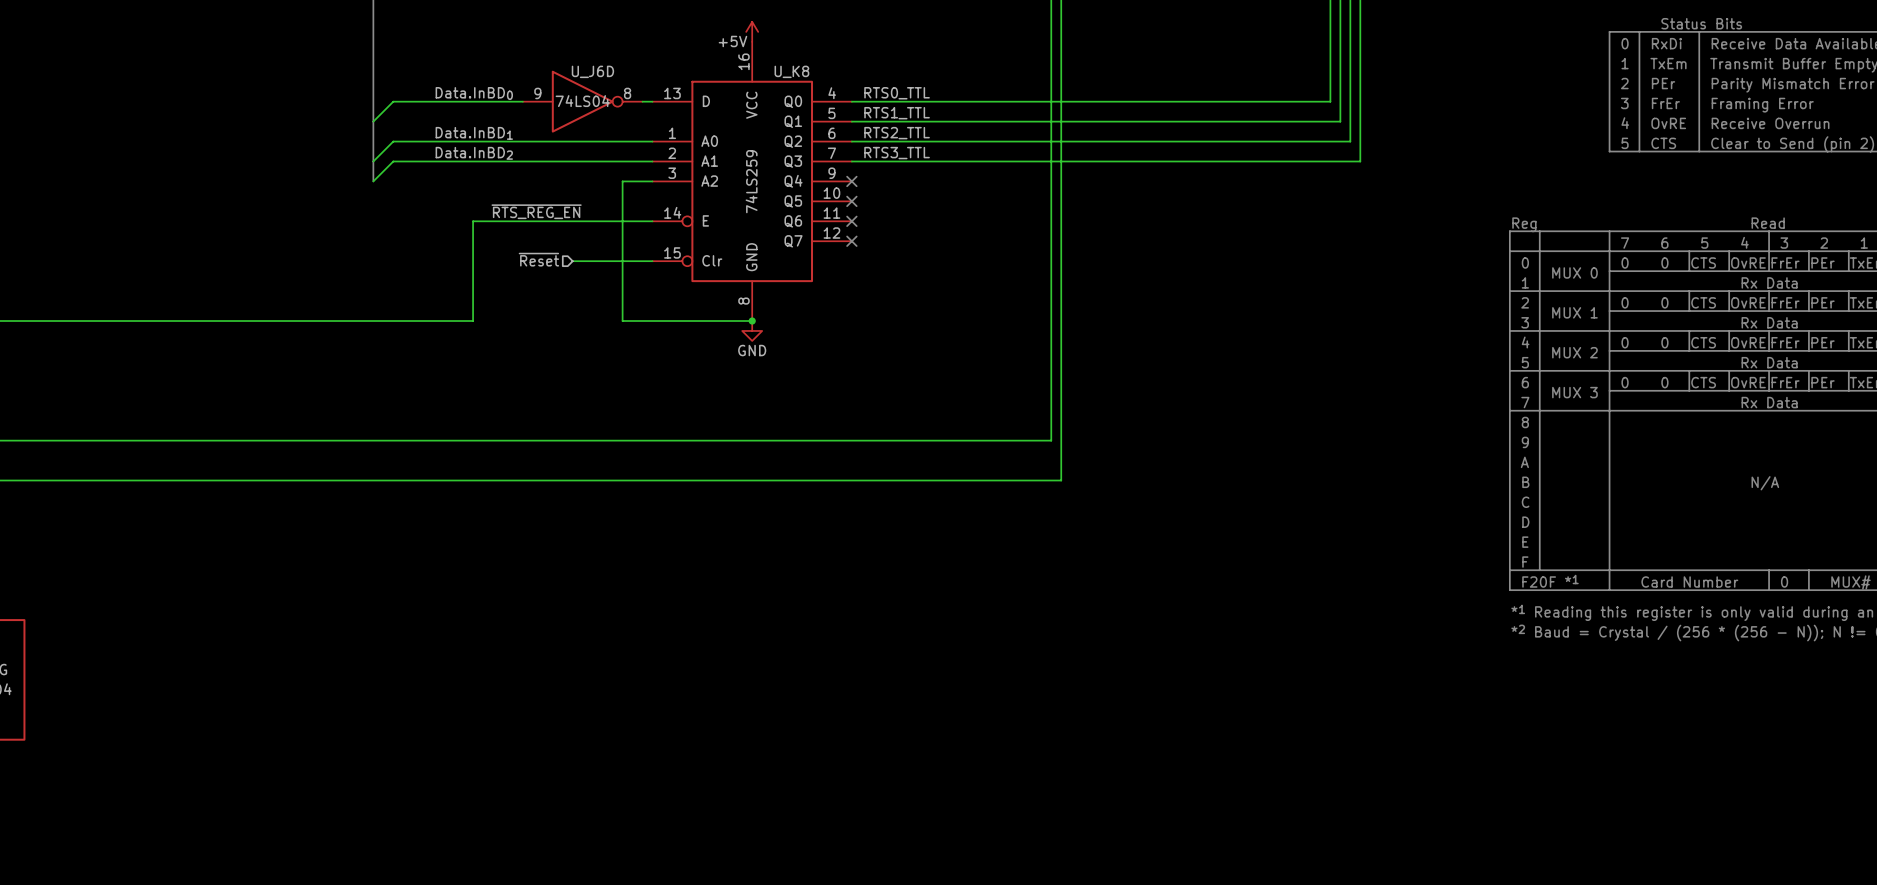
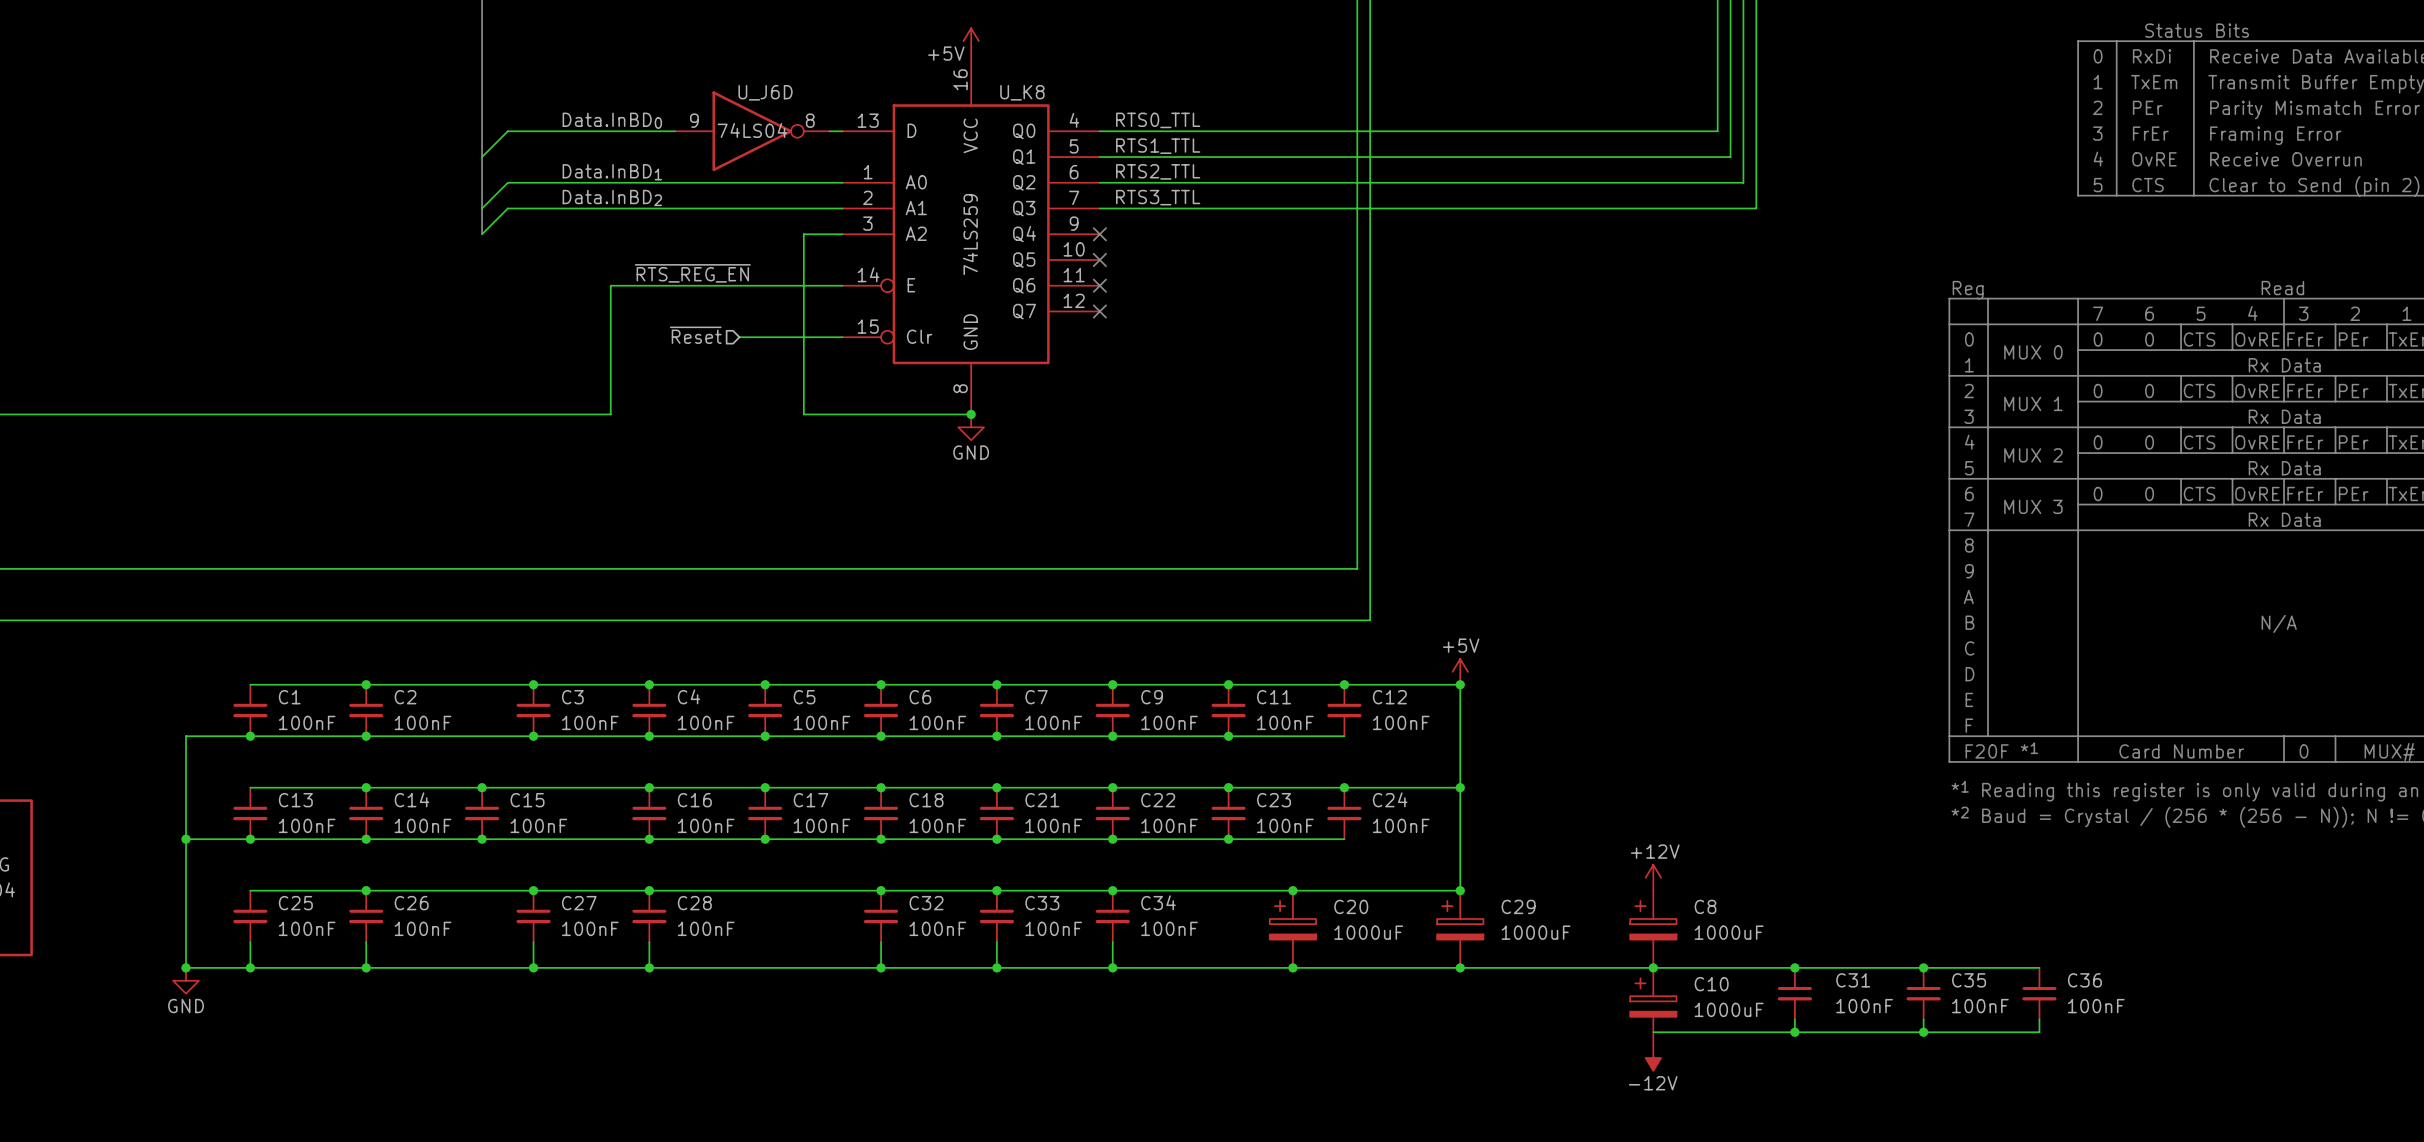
power symbol: none -> +5V (1460, 671)
wire: none -> (250, 684) (1460, 684) (1460, 890) (250, 890)
junction: none -> (366, 684)
junction: none -> (533, 684)
junction: none -> (649, 684)
junction: none -> (765, 684)
junction: none -> (881, 684)
junction: none -> (996, 684)
junction: none -> (1112, 684)
junction: none -> (1228, 684)
junction: none -> (1344, 684)
junction: none -> (1460, 684)
C1: none -> 100nF (250, 710)
C2: none -> 100nF (366, 710)
C3: none -> 100nF (533, 710)
C4: none -> 100nF (649, 710)
C5: none -> 100nF (765, 710)
C6: none -> 100nF (881, 710)
C7: none -> 100nF (996, 710)
C9: none -> 100nF (1112, 710)
C11: none -> 100nF (1228, 710)
C12: none -> 100nF (1344, 710)
junction: none -> (250, 736)
junction: none -> (366, 736)
junction: none -> (533, 736)
junction: none -> (649, 736)
junction: none -> (765, 736)
junction: none -> (881, 736)
junction: none -> (996, 736)
junction: none -> (1112, 736)
junction: none -> (1228, 736)
wire: none -> (1344, 736) (186, 736) (186, 967) (2039, 967)
wire: none -> (250, 787) (1460, 787)
junction: none -> (366, 787)
junction: none -> (482, 787)
junction: none -> (649, 787)
junction: none -> (765, 787)
junction: none -> (881, 787)
junction: none -> (996, 787)
junction: none -> (1112, 787)
junction: none -> (1228, 787)
junction: none -> (1344, 787)
junction: none -> (1460, 787)
C13: none -> 100nF (250, 813)
C14: none -> 100nF (366, 813)
C15: none -> 100nF (482, 813)
C16: none -> 100nF (649, 813)
C17: none -> 100nF (765, 813)
C18: none -> 100nF (881, 813)
C21: none -> 100nF (996, 813)
C22: none -> 100nF (1112, 813)
C23: none -> 100nF (1228, 813)
C24: none -> 100nF (1344, 813)
wire: none -> (186, 839) (1344, 839)
junction: none -> (186, 839)
junction: none -> (250, 839)
junction: none -> (366, 839)
junction: none -> (482, 839)
junction: none -> (649, 839)
junction: none -> (765, 839)
junction: none -> (881, 839)
junction: none -> (996, 839)
junction: none -> (1112, 839)
junction: none -> (1228, 839)
power symbol: none -> +12V (1653, 877)
junction: none -> (366, 890)
junction: none -> (533, 890)
junction: none -> (649, 890)
junction: none -> (881, 890)
junction: none -> (996, 890)
junction: none -> (1112, 890)
junction: none -> (1292, 890)
junction: none -> (1460, 890)
C25: none -> 100nF (250, 916)
C26: none -> 100nF (366, 916)
C27: none -> 100nF (533, 916)
C28: none -> 100nF (649, 916)
C32: none -> 100nF (881, 916)
C33: none -> 100nF (996, 916)
C34: none -> 100nF (1112, 916)
C20: none -> 1000uF (1292, 929)
C29: none -> 1000uF (1460, 929)
C8: none -> 1000uF (1653, 929)
wire: none -> (250, 942) (250, 967)
wire: none -> (366, 942) (366, 967)
wire: none -> (533, 942) (533, 967)
wire: none -> (649, 942) (649, 967)
wire: none -> (881, 942) (881, 967)
wire: none -> (996, 942) (996, 967)
wire: none -> (1112, 942) (1112, 967)
junction: none -> (186, 967)
junction: none -> (250, 967)
junction: none -> (366, 967)
junction: none -> (533, 967)
junction: none -> (649, 967)
junction: none -> (881, 967)
junction: none -> (996, 967)
junction: none -> (1112, 967)
junction: none -> (1292, 967)
junction: none -> (1460, 967)
junction: none -> (1653, 967)
junction: none -> (1794, 967)
junction: none -> (1923, 967)
power symbol: none -> GND (186, 980)
C31: none -> 100nF (1794, 993)
C35: none -> 100nF (1923, 993)
C36: none -> 100nF (2039, 993)
C10: none -> 1000uF (1653, 1006)
wire: none -> (1794, 1019) (1794, 1032)
wire: none -> (1923, 1019) (1923, 1032)
wire: none -> (2039, 1019) (2039, 1032) (1653, 1032)
junction: none -> (1794, 1032)
junction: none -> (1923, 1032)
power symbol: none -> -12V (1653, 1057)

